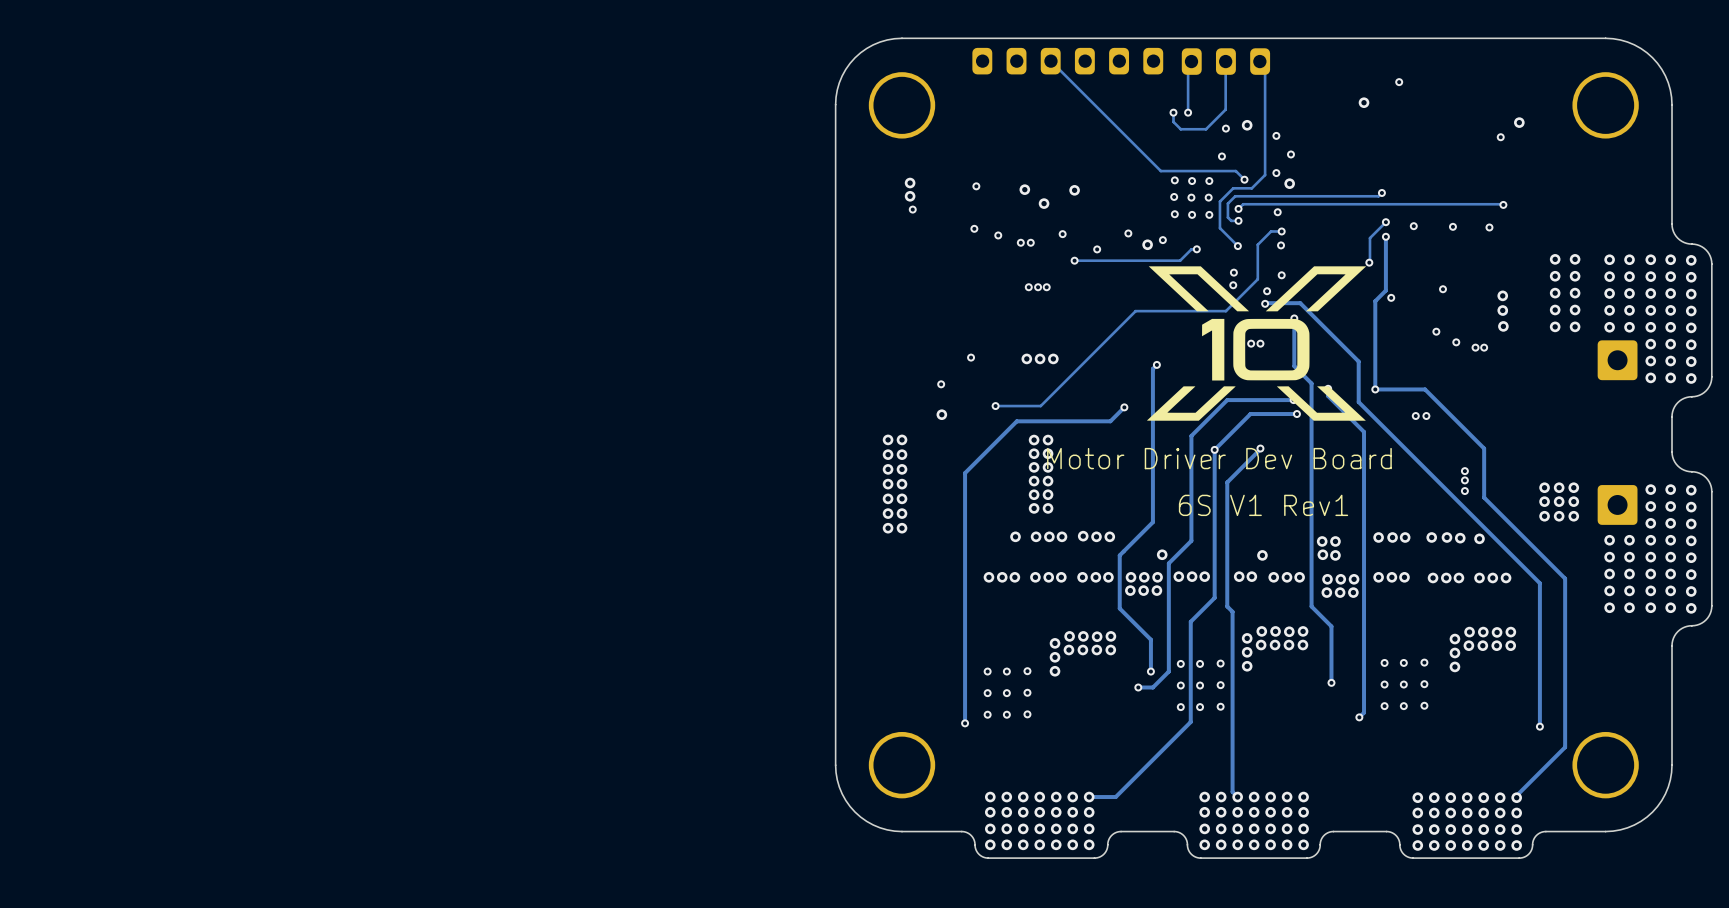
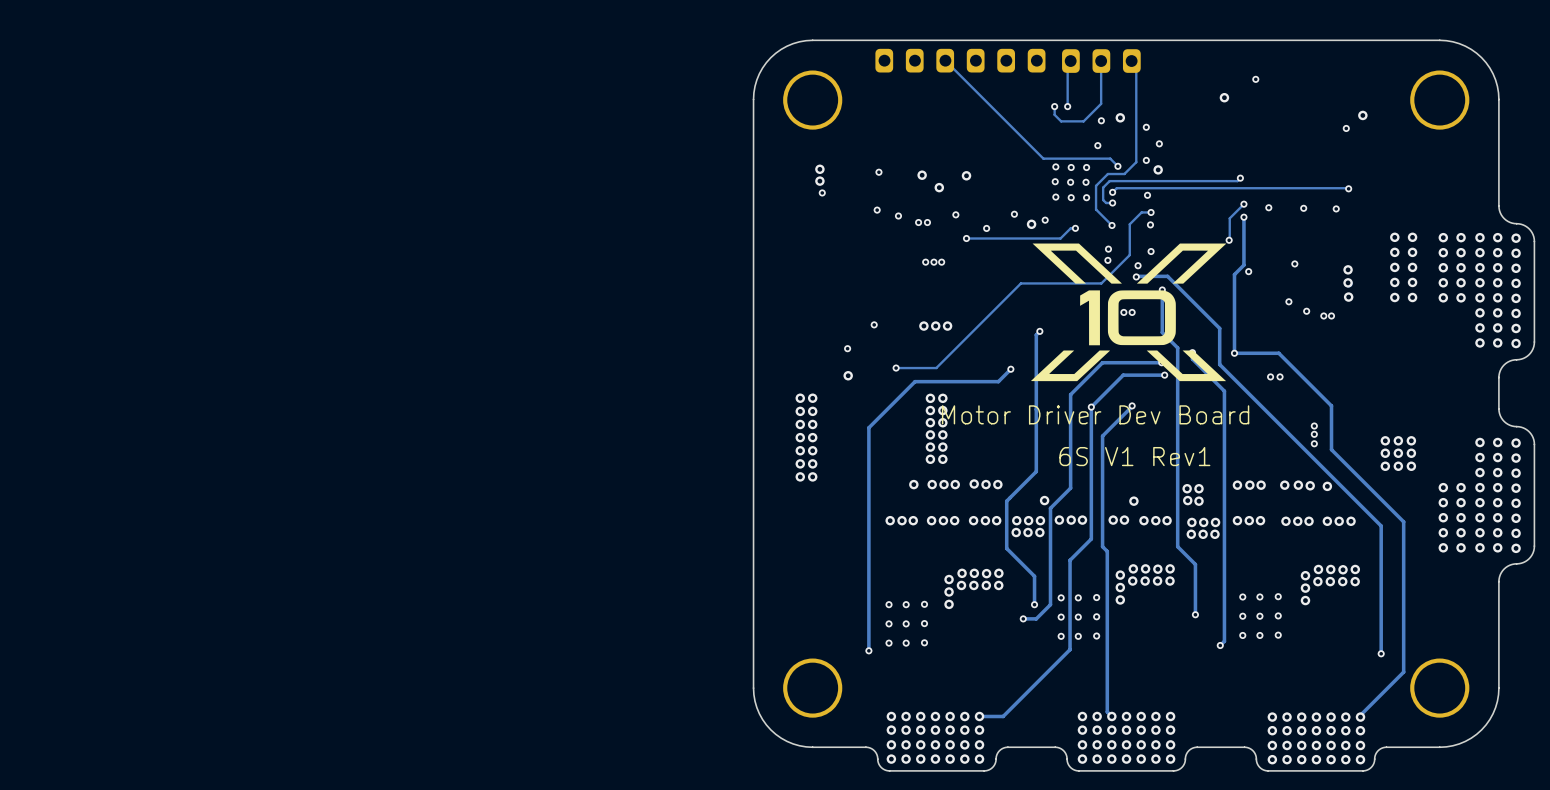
part: (1617, 360) -> none
part: (1617, 504) -> none

